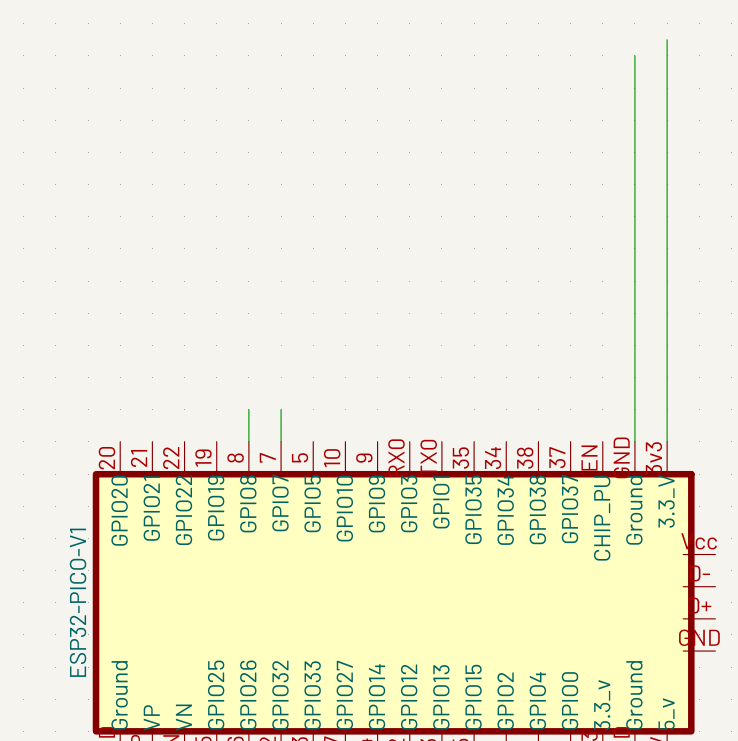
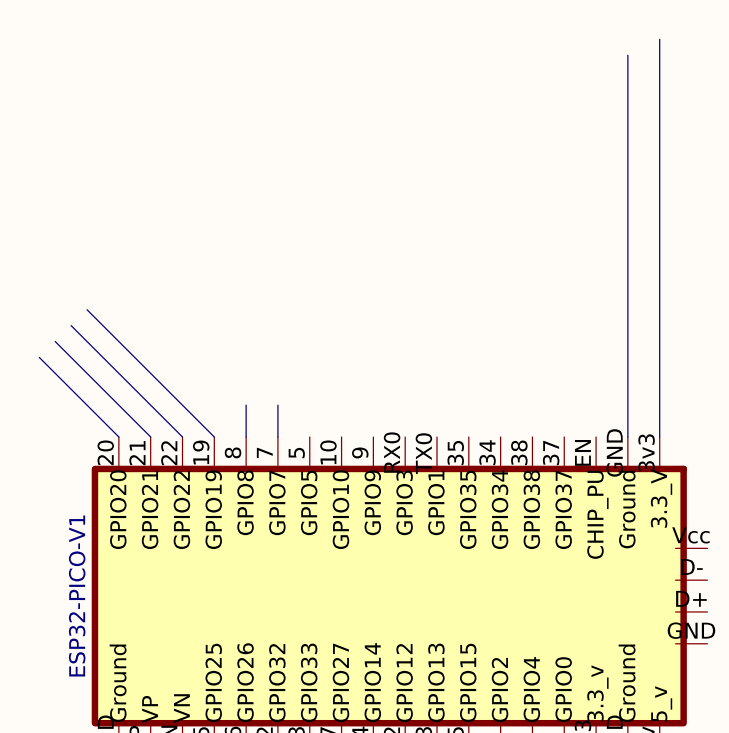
wire: none -> (87, 309) (214, 437)
wire: none -> (71, 325) (182, 437)
wire: none -> (55, 341) (150, 437)
wire: none -> (39, 357) (118, 437)

